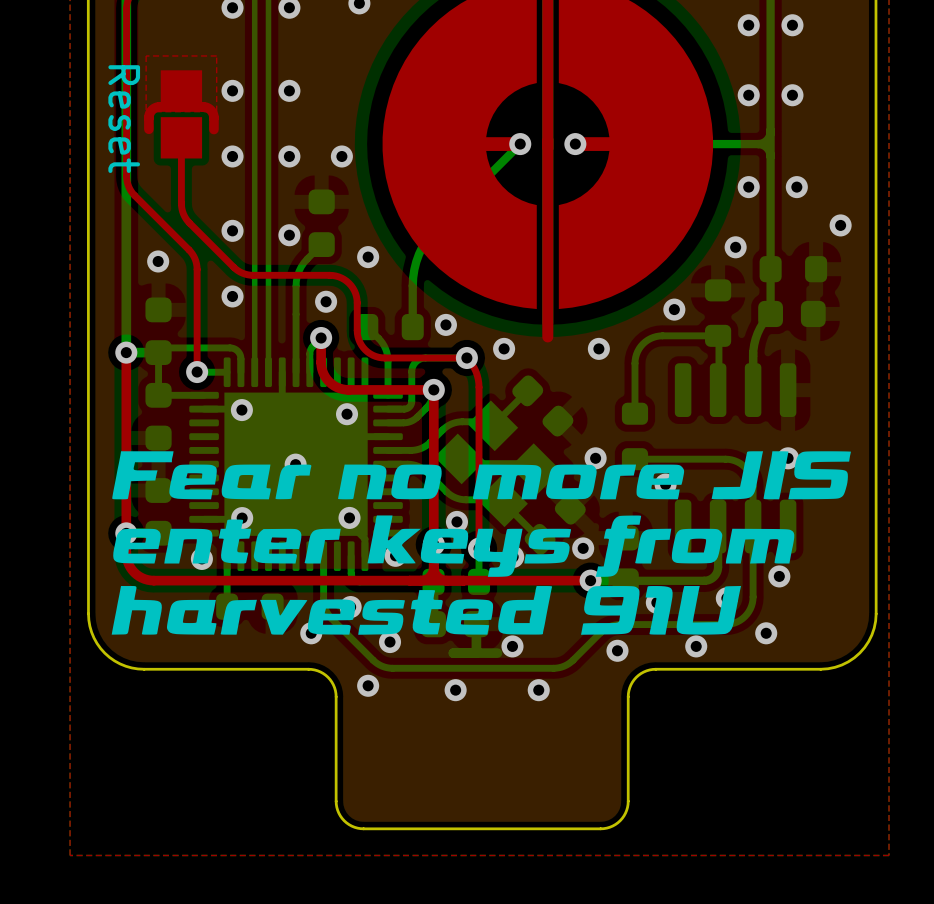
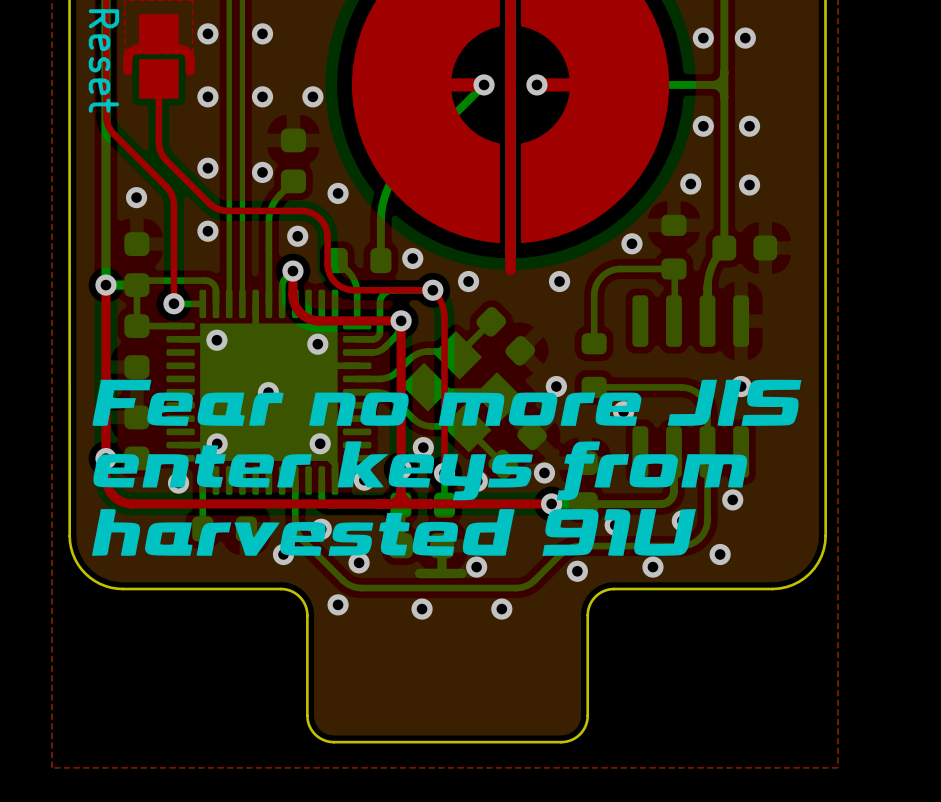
via position: (840, 225) -> (749, 185)
part: (793, 269) -> none

